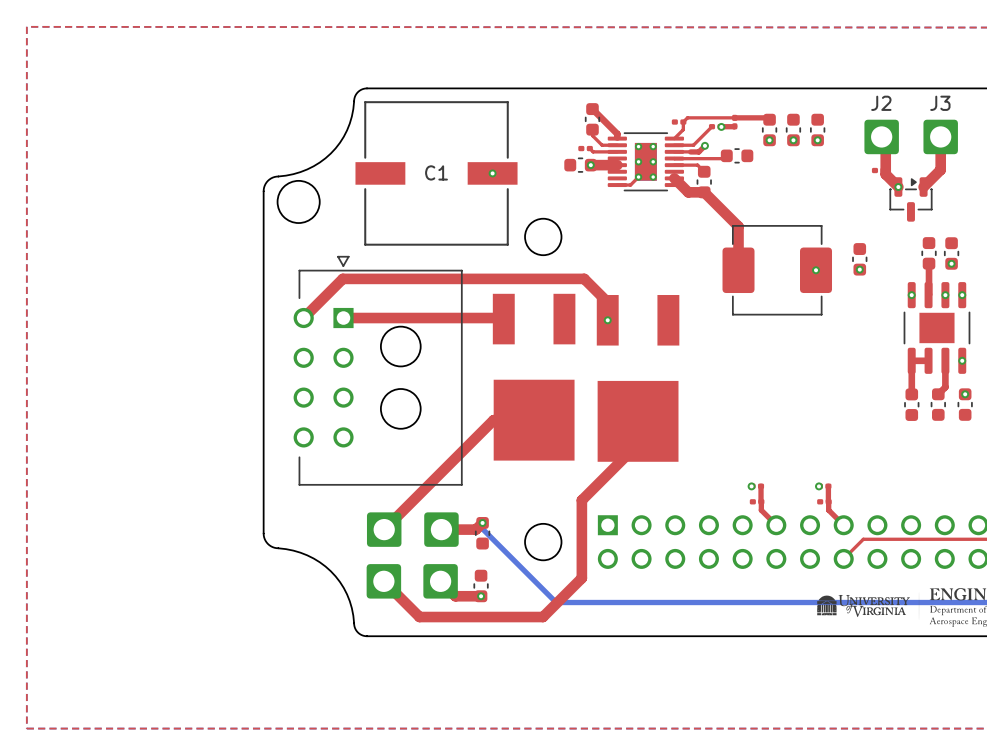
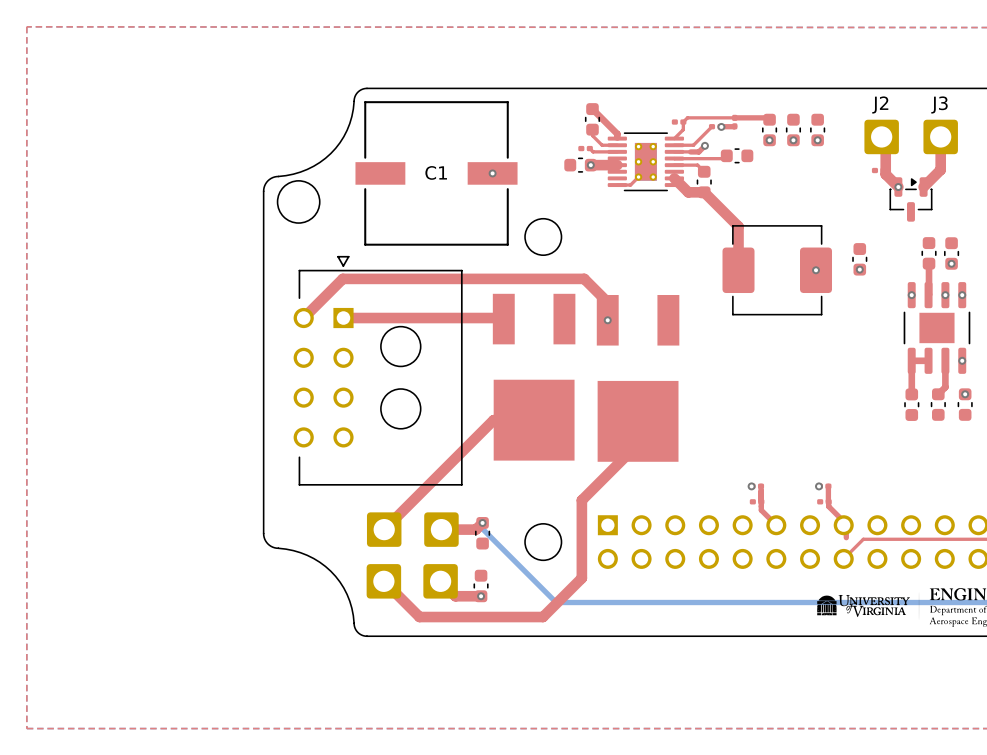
top track: (828, 506) (828, 510) (843, 525) -> (828, 506) (846, 524) (846, 537)

